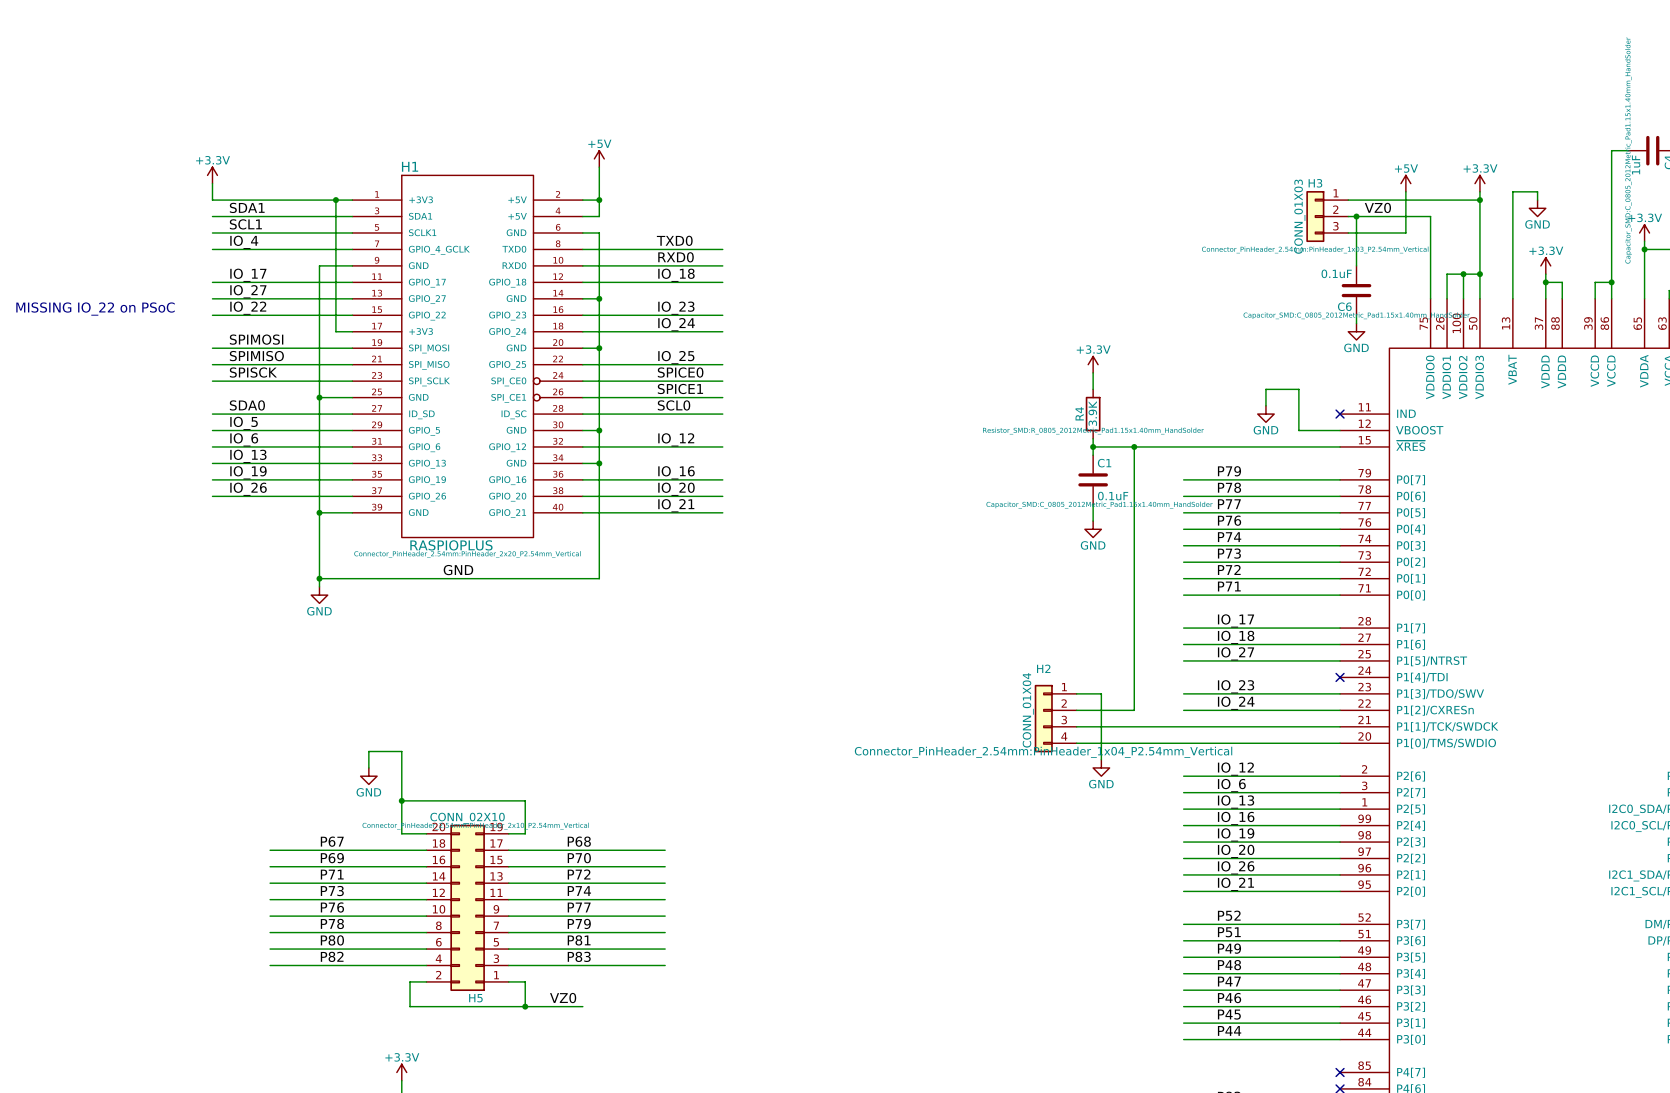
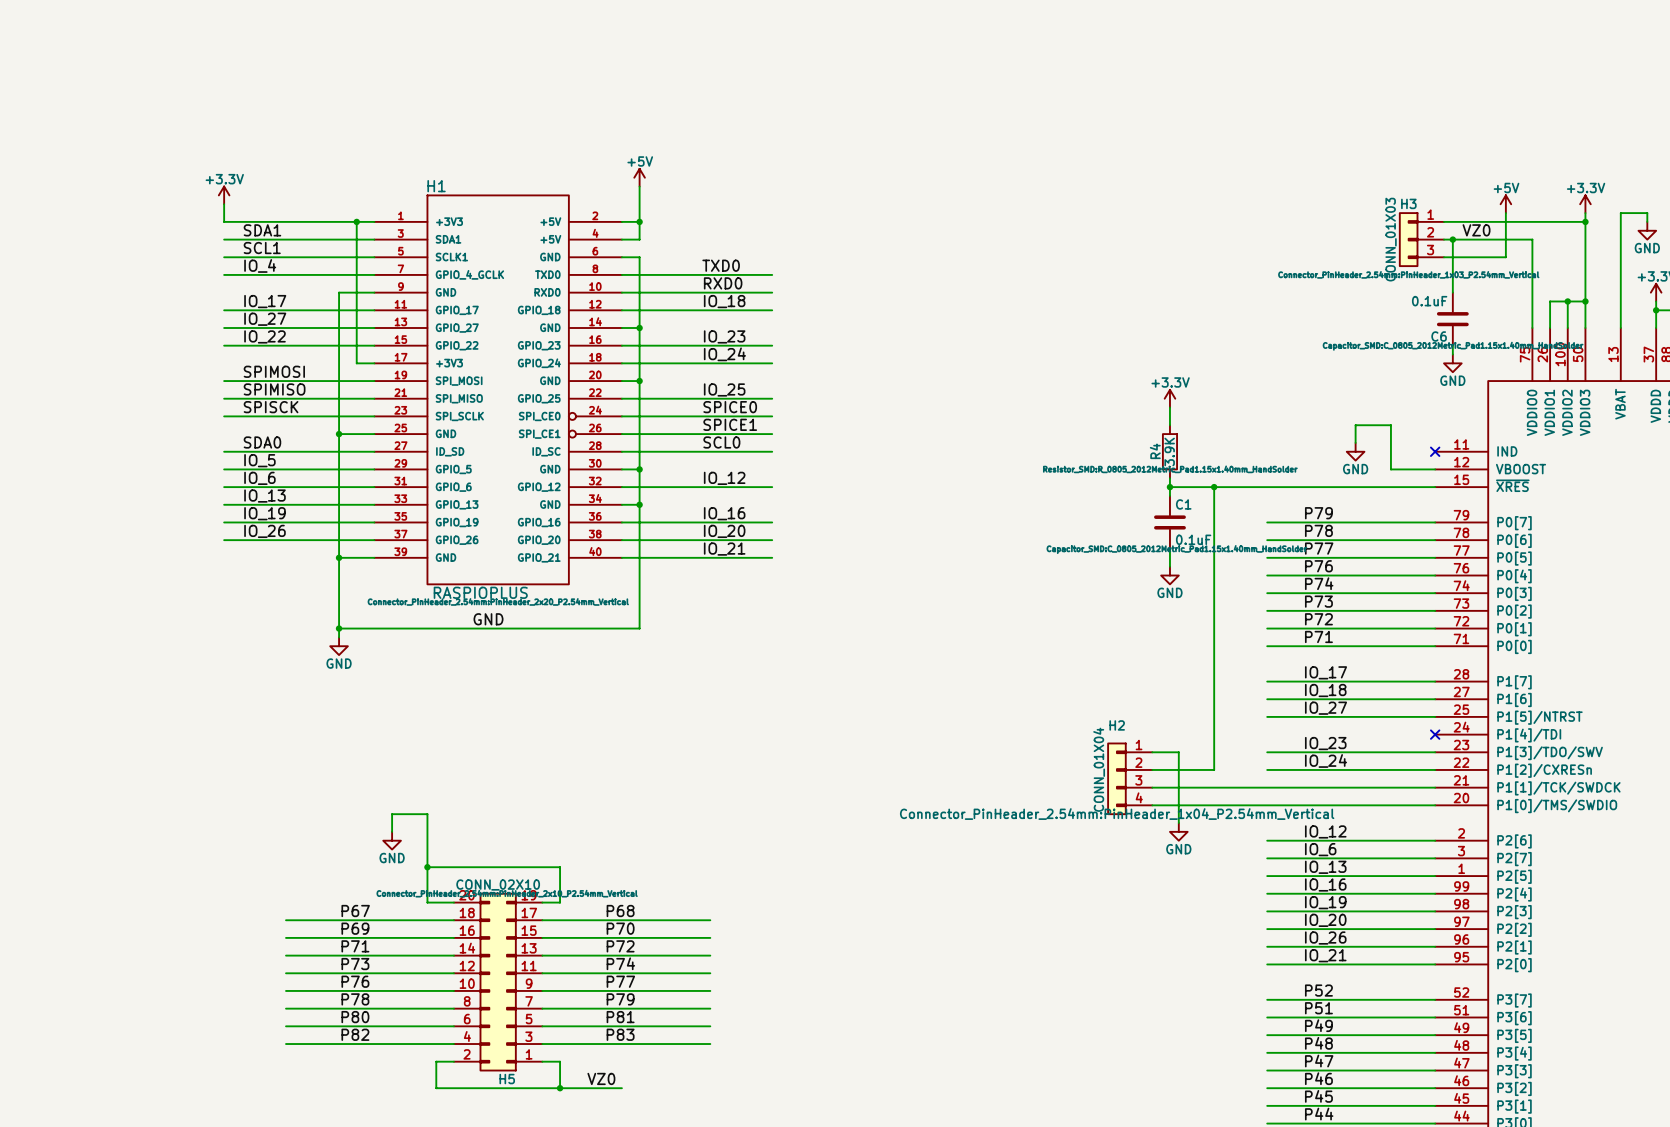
text: MISSING IO_22 on PSoC (95, 309) -> none

